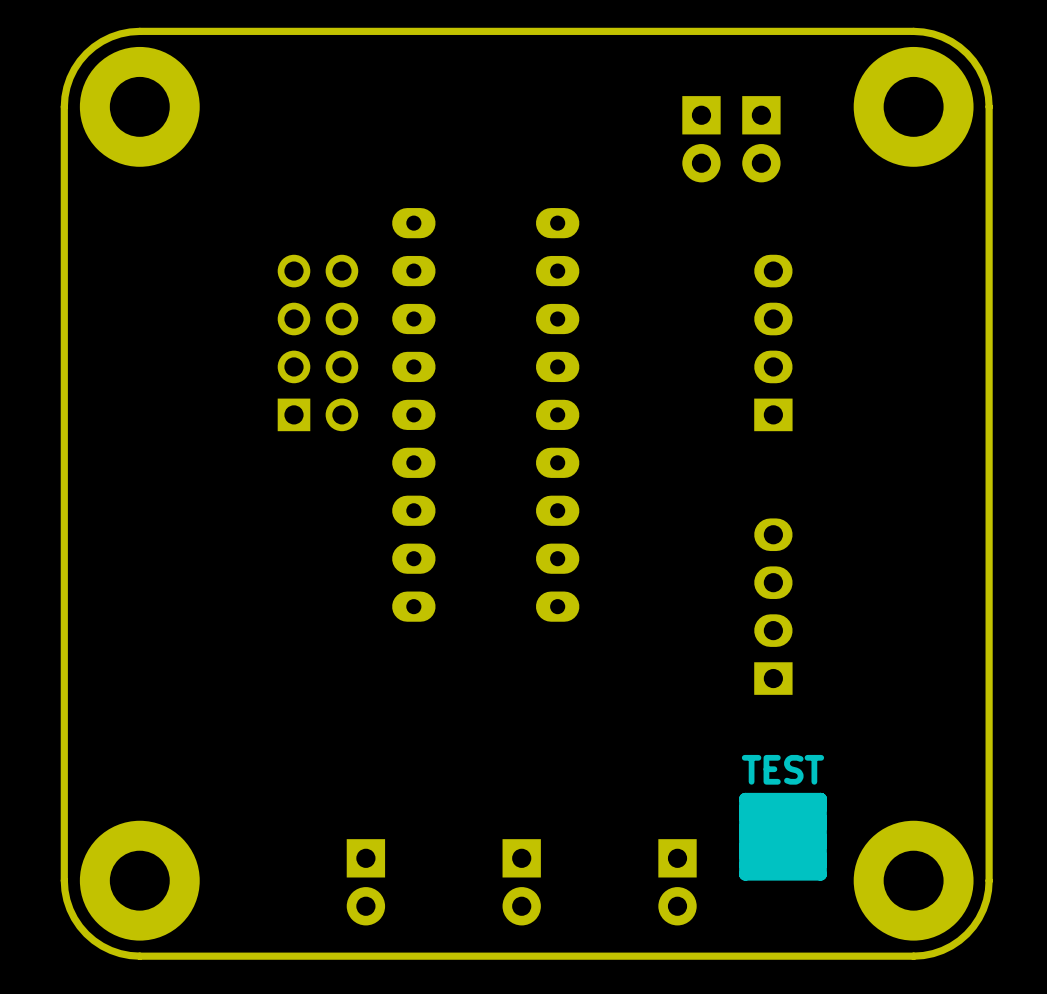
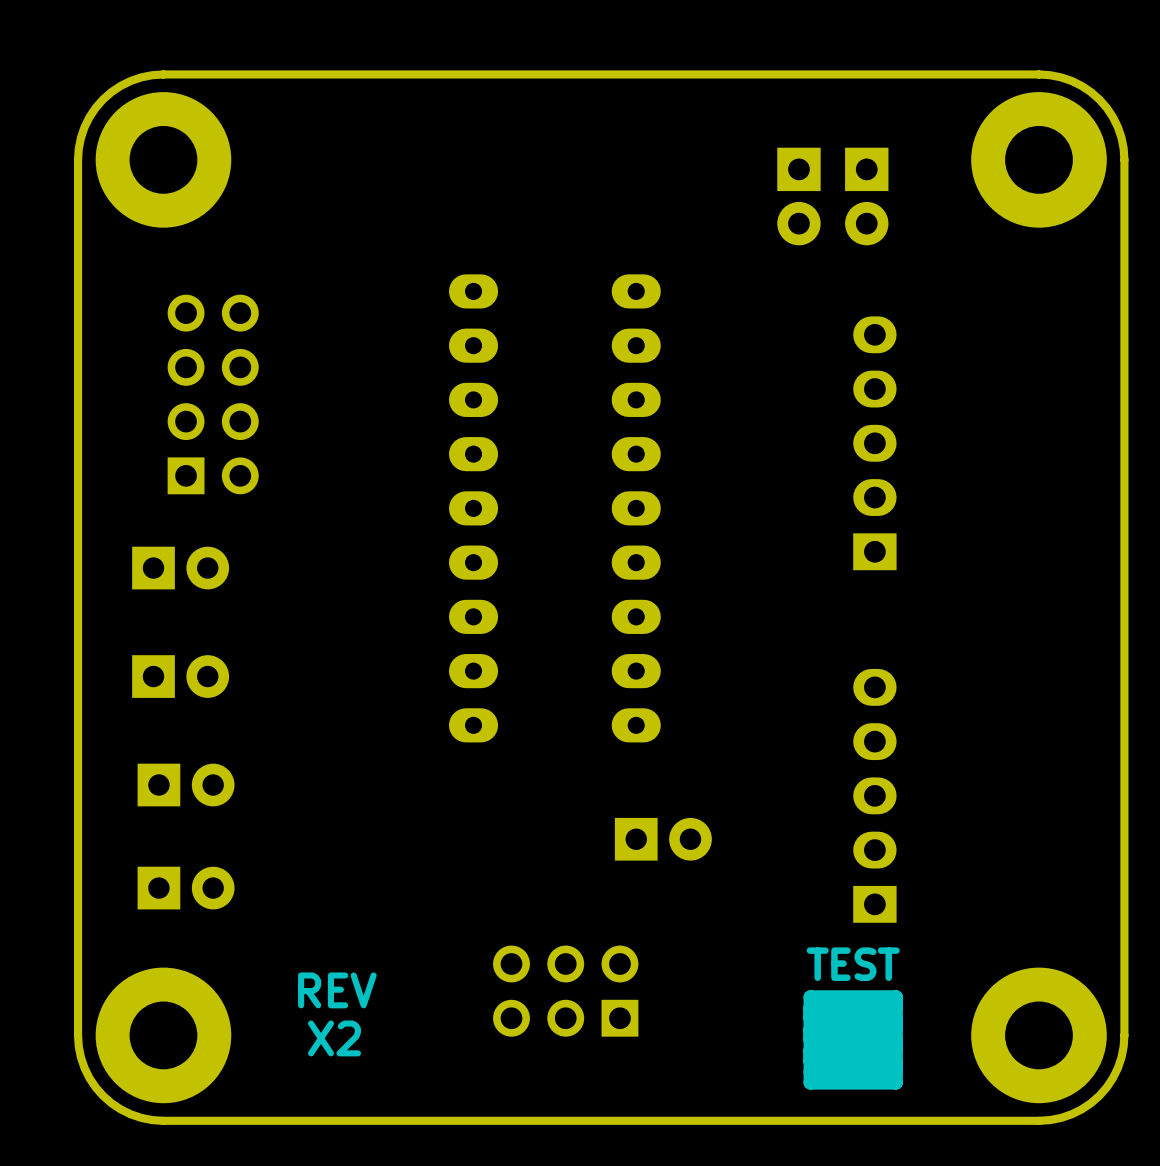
part footprint: [754, 254, 793, 432] -> [853, 316, 897, 571]
part position: (317, 342) -> (213, 394)
part: none -> (180, 568)
part: none -> (180, 676)
part: (773, 606) -> none
part: none -> (186, 785)
part: none -> (874, 795)
part: none -> (663, 839)
part: none -> (186, 888)
TEST position: (782, 836) -> (853, 1039)
text: none -> REV (337, 990)
part: none -> (565, 991)
part: (365, 882) -> none
part: (521, 882) -> none
part: (677, 882) -> none
text: none -> X2 (334, 1038)

